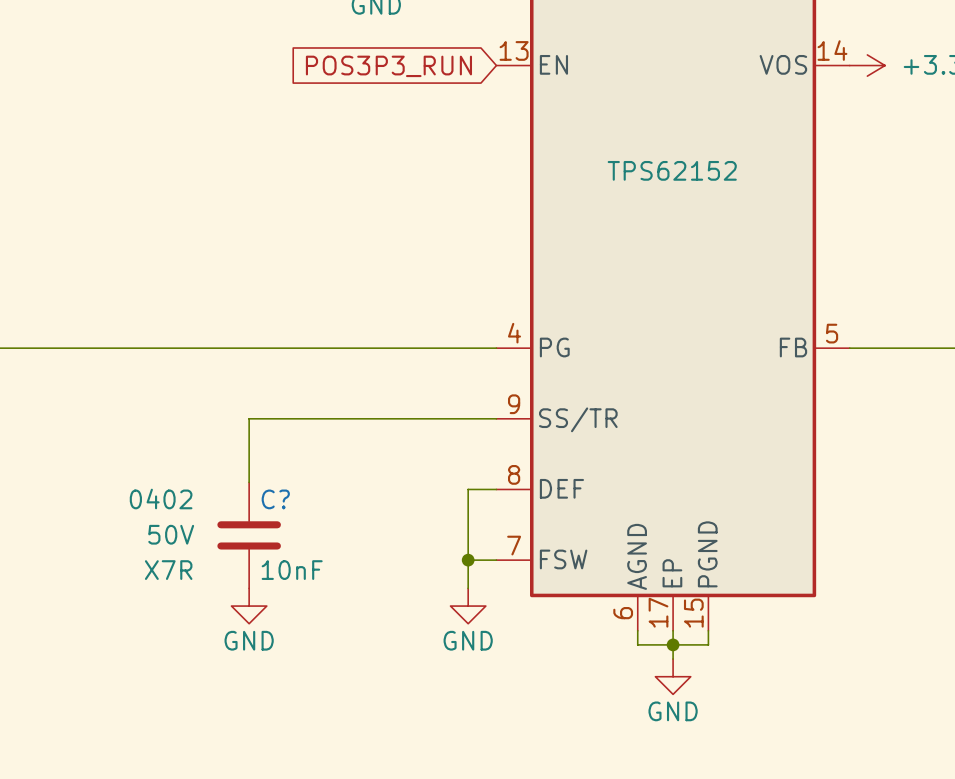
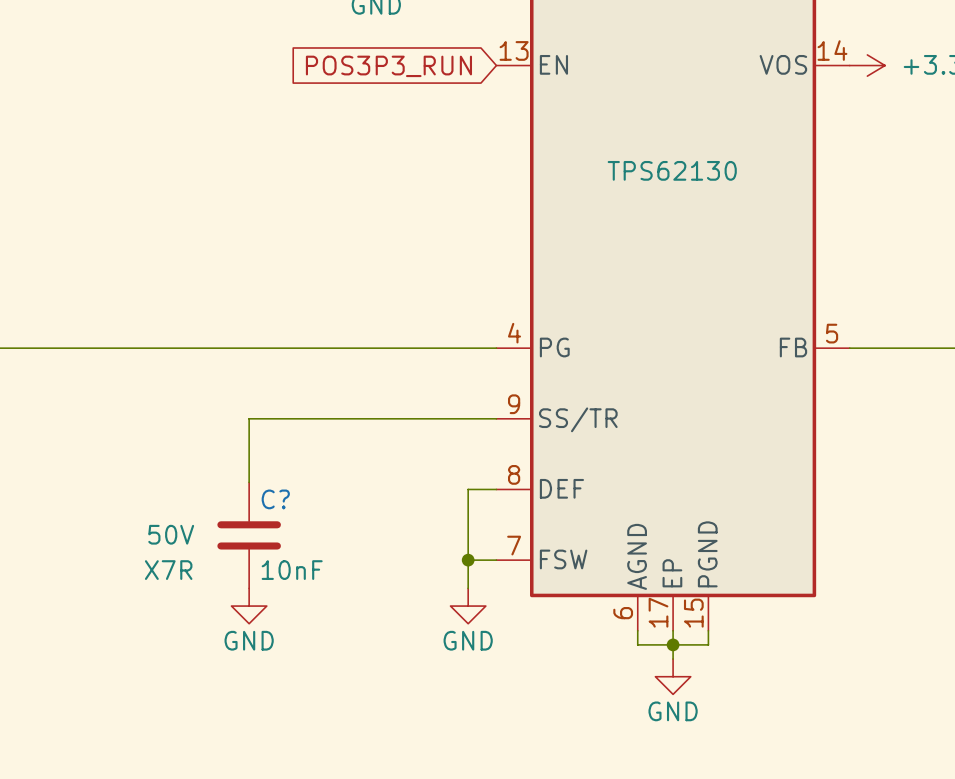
part value: TPS62152 (672, 170) -> TPS62130 (672, 170)
C? text: 0402 (161, 498) -> none

